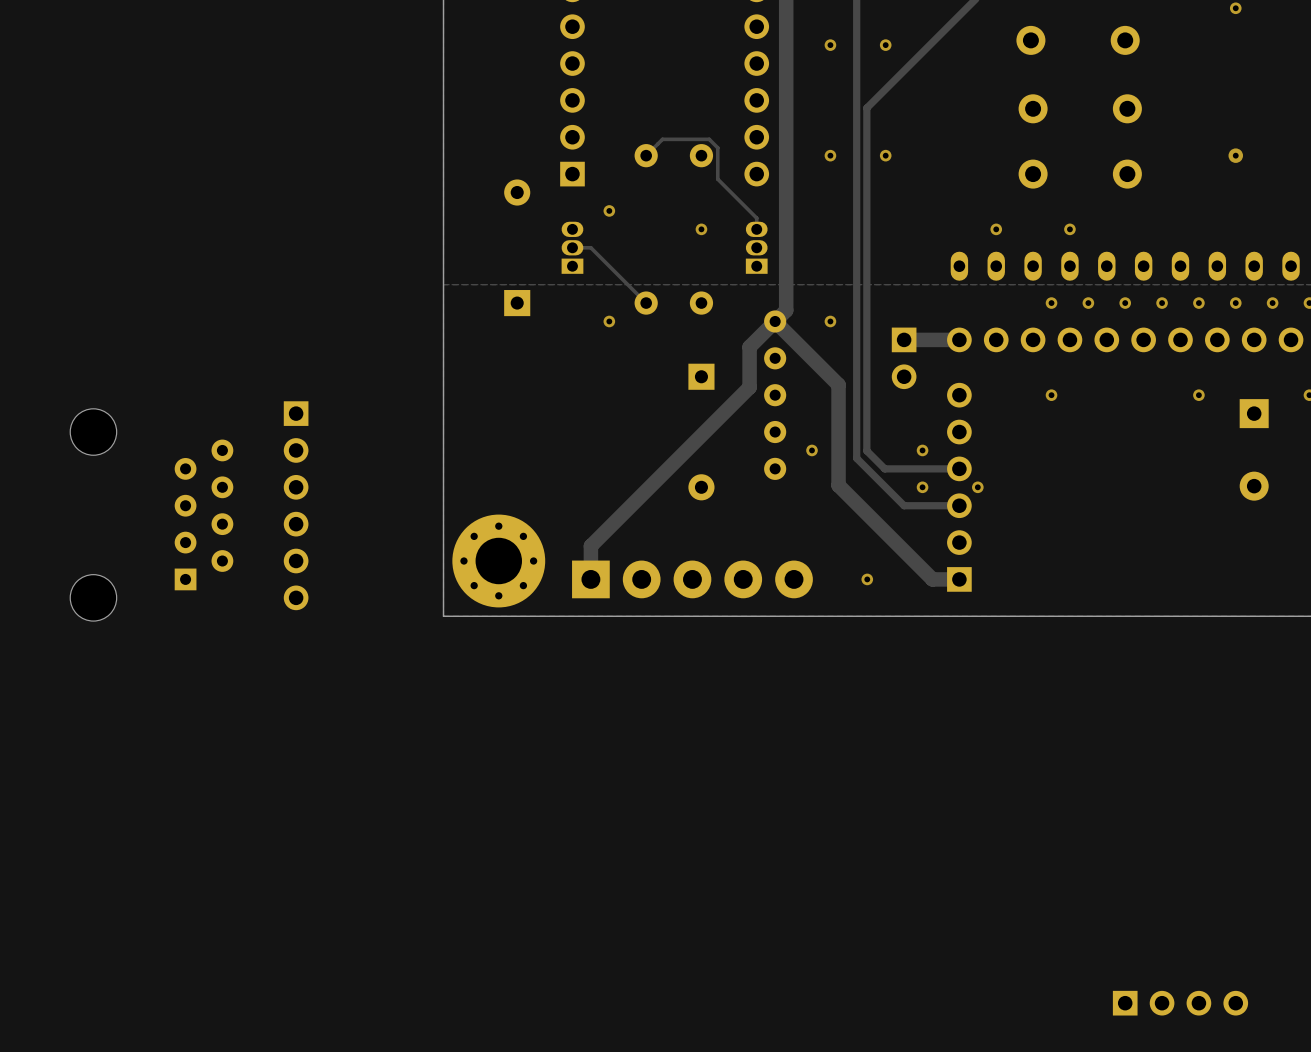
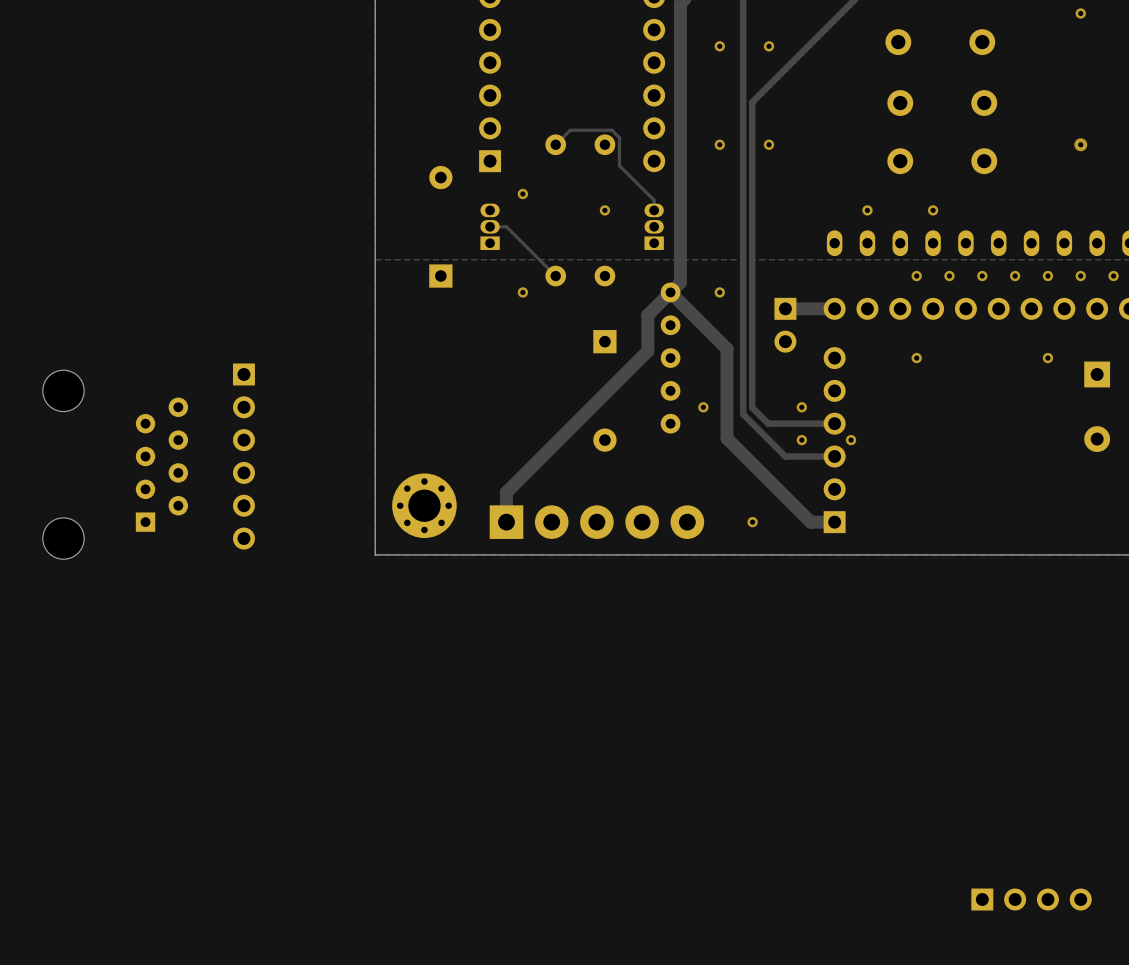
part footprint: [452, 514, 546, 608] -> [392, 473, 457, 539]

